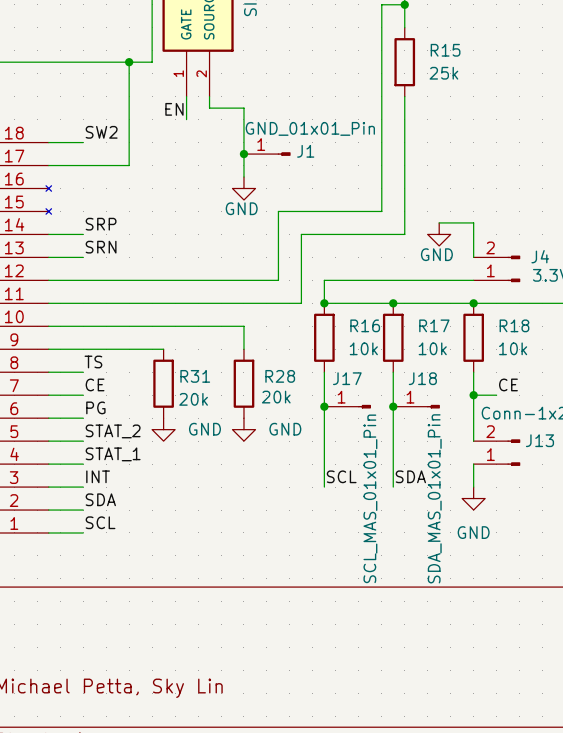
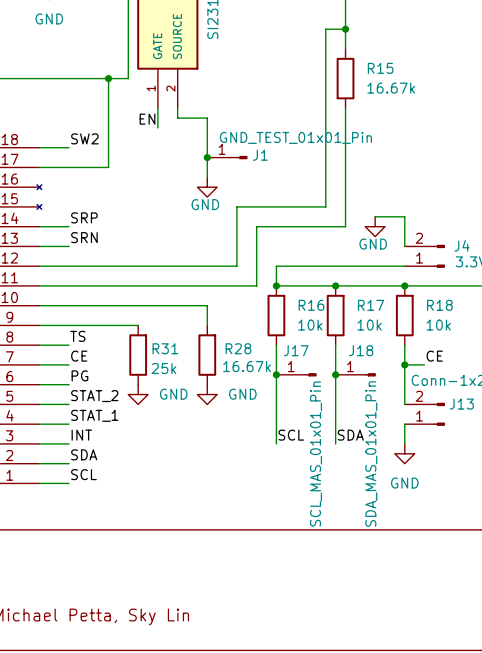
R15 value: 25k (443, 73) -> 16.67k (391, 88)
J1 value: GND_01x01_Pin (310, 128) -> GND_TEST_01x01_Pin (295, 137)
R28 value: 20k (276, 397) -> 16.67k (247, 366)
R31 value: 20k (193, 399) -> 25k (163, 368)

